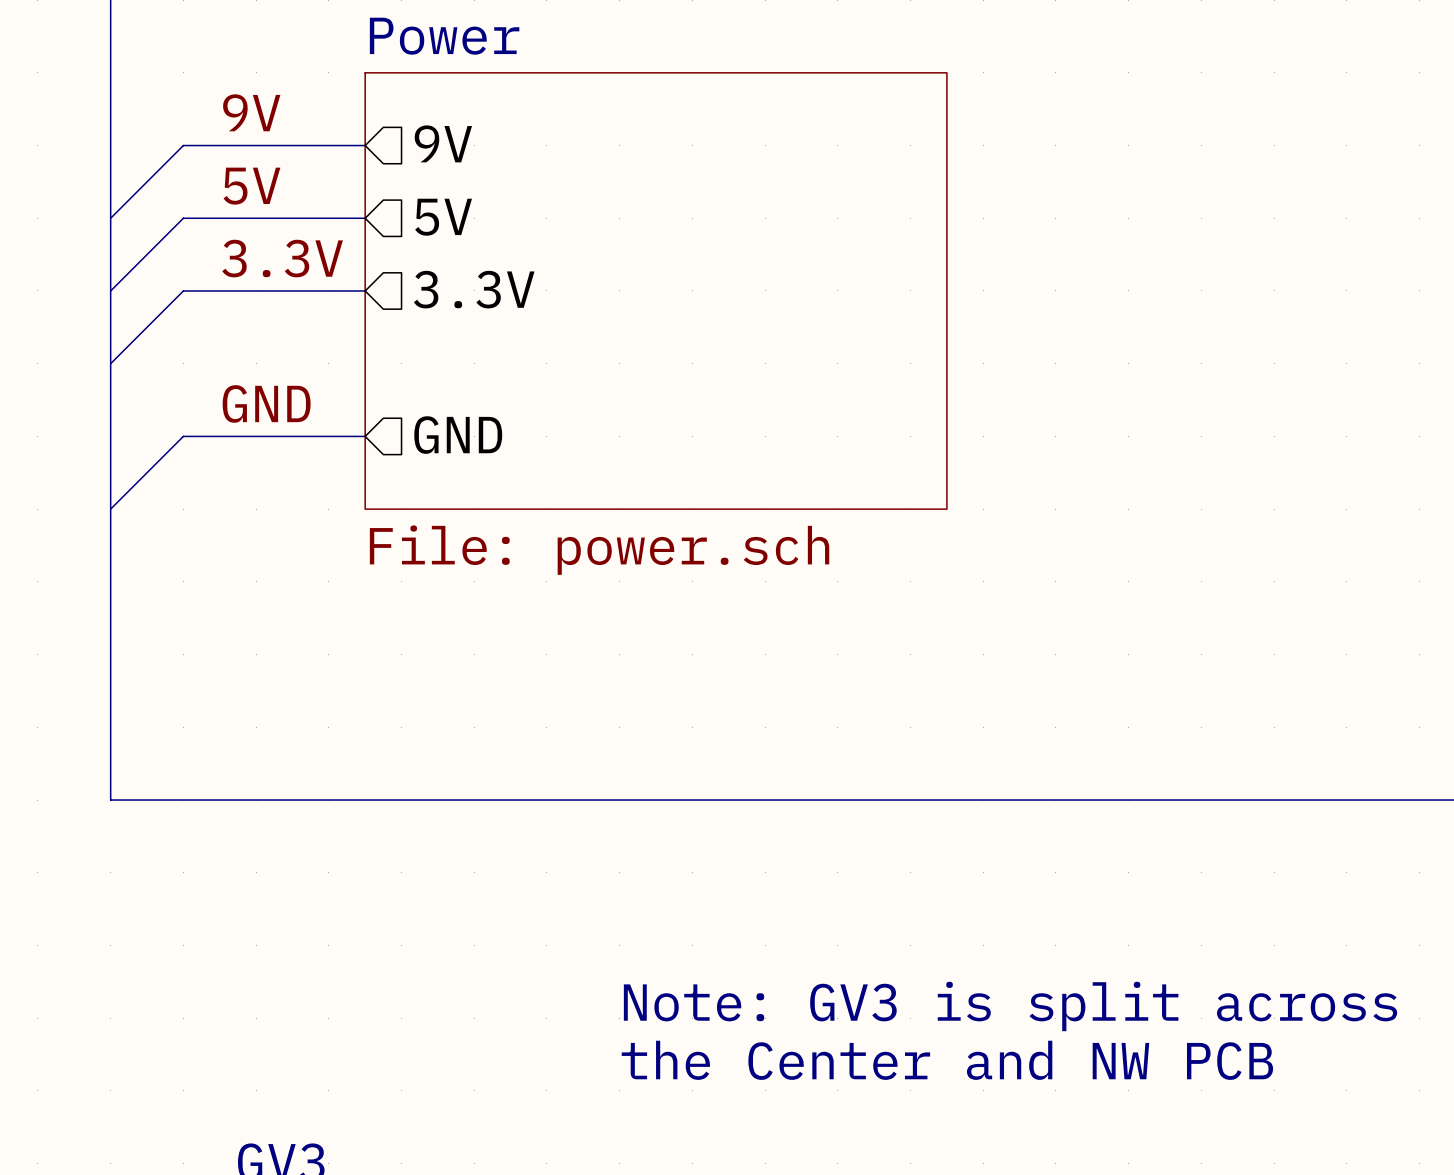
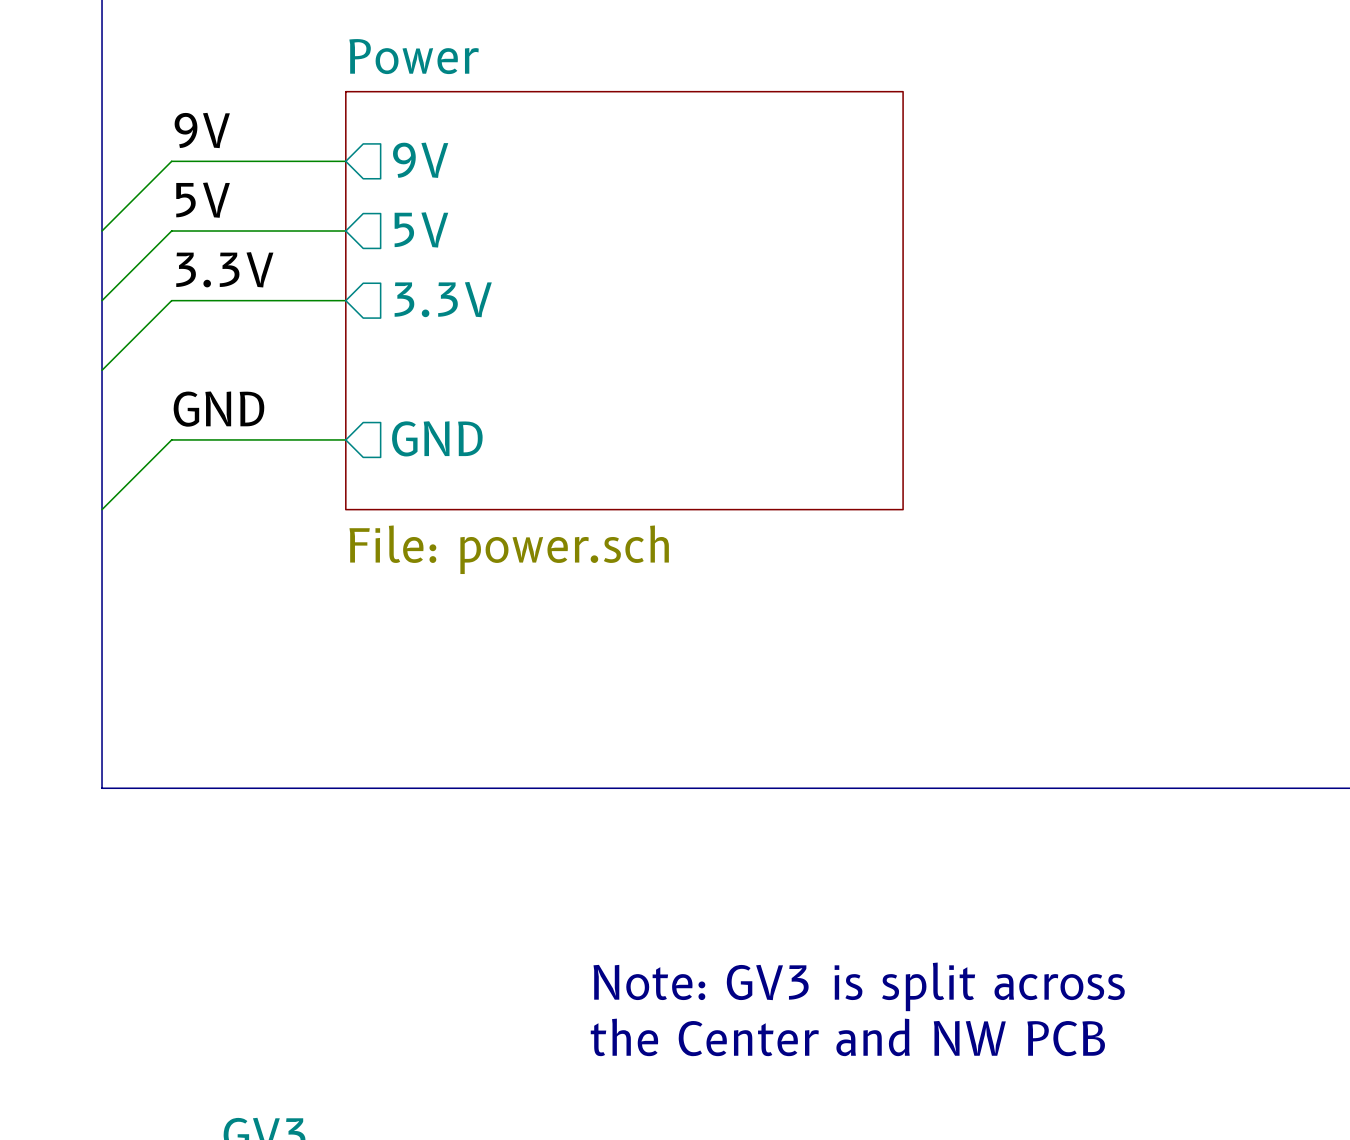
label position: 9V (251, 112) -> 9V (202, 130)
label position: 5V (251, 186) -> 5V (203, 200)
label position: 3.3V (282, 258) -> 3.3V (224, 269)
label position: GND (266, 403) -> GND (218, 409)

